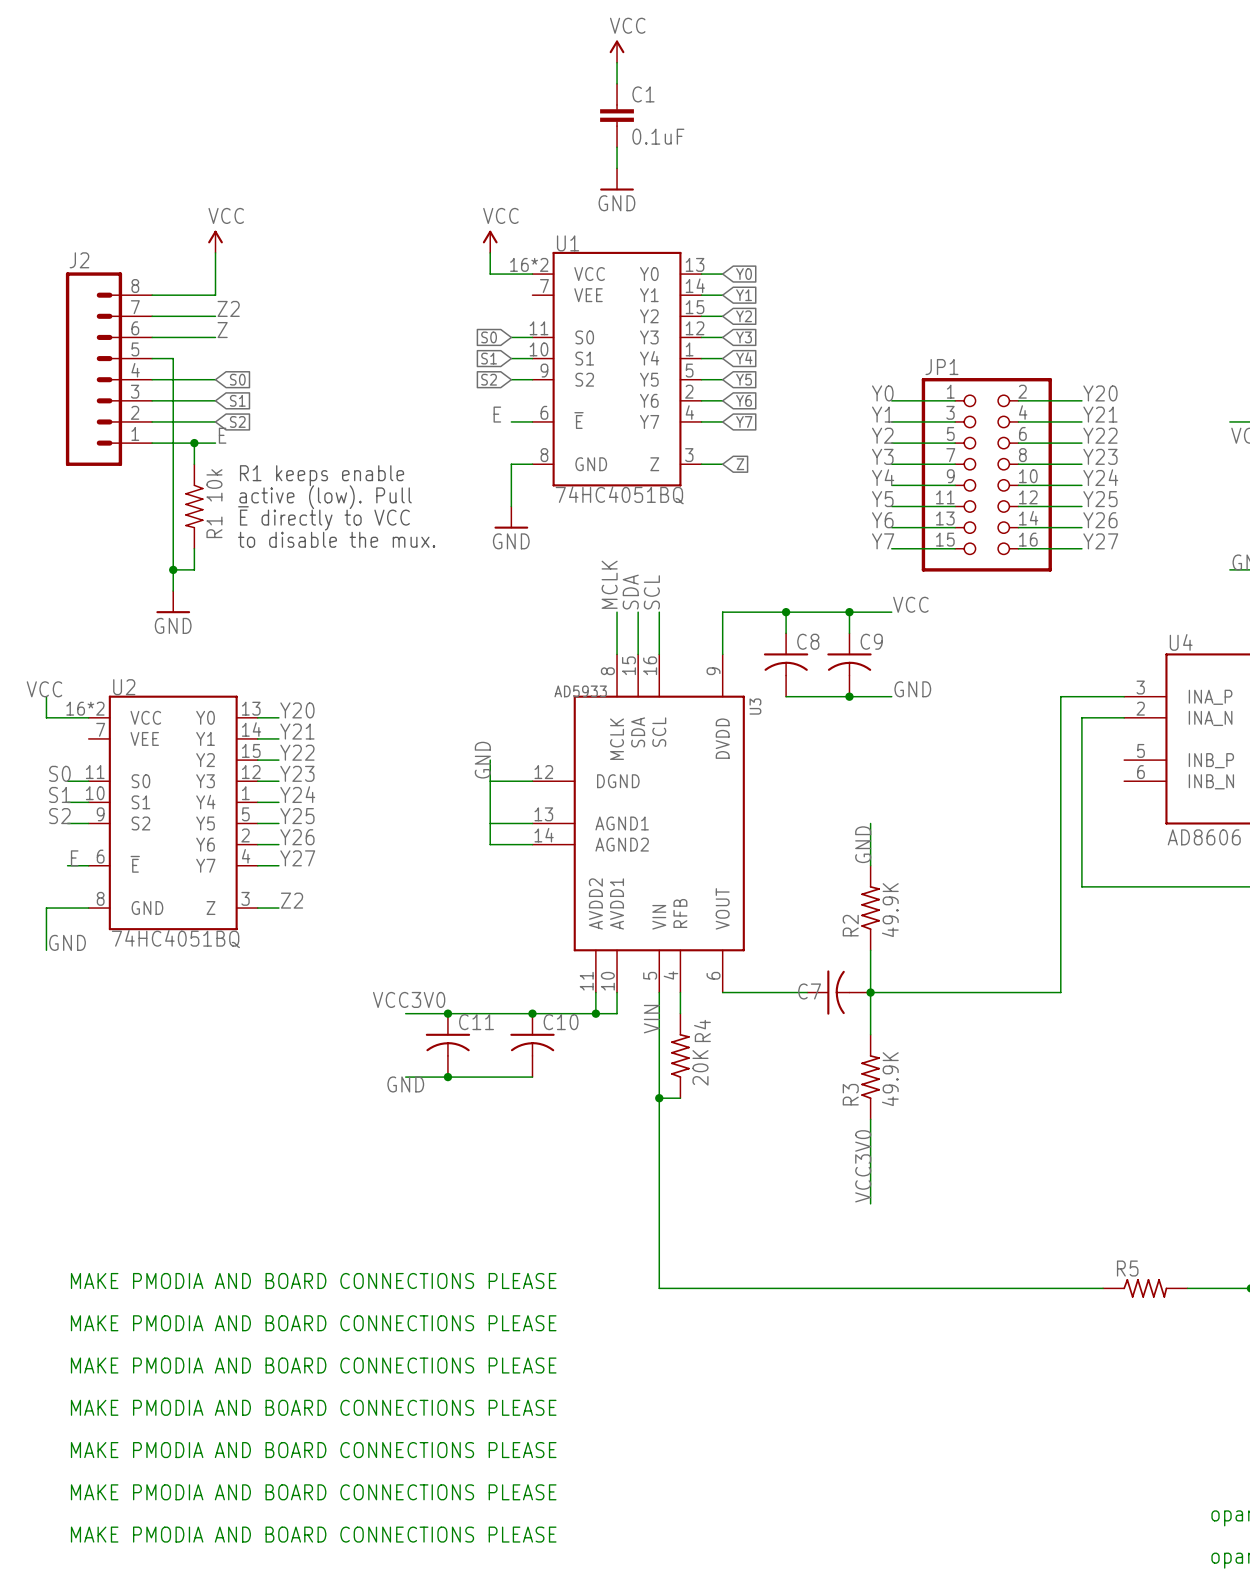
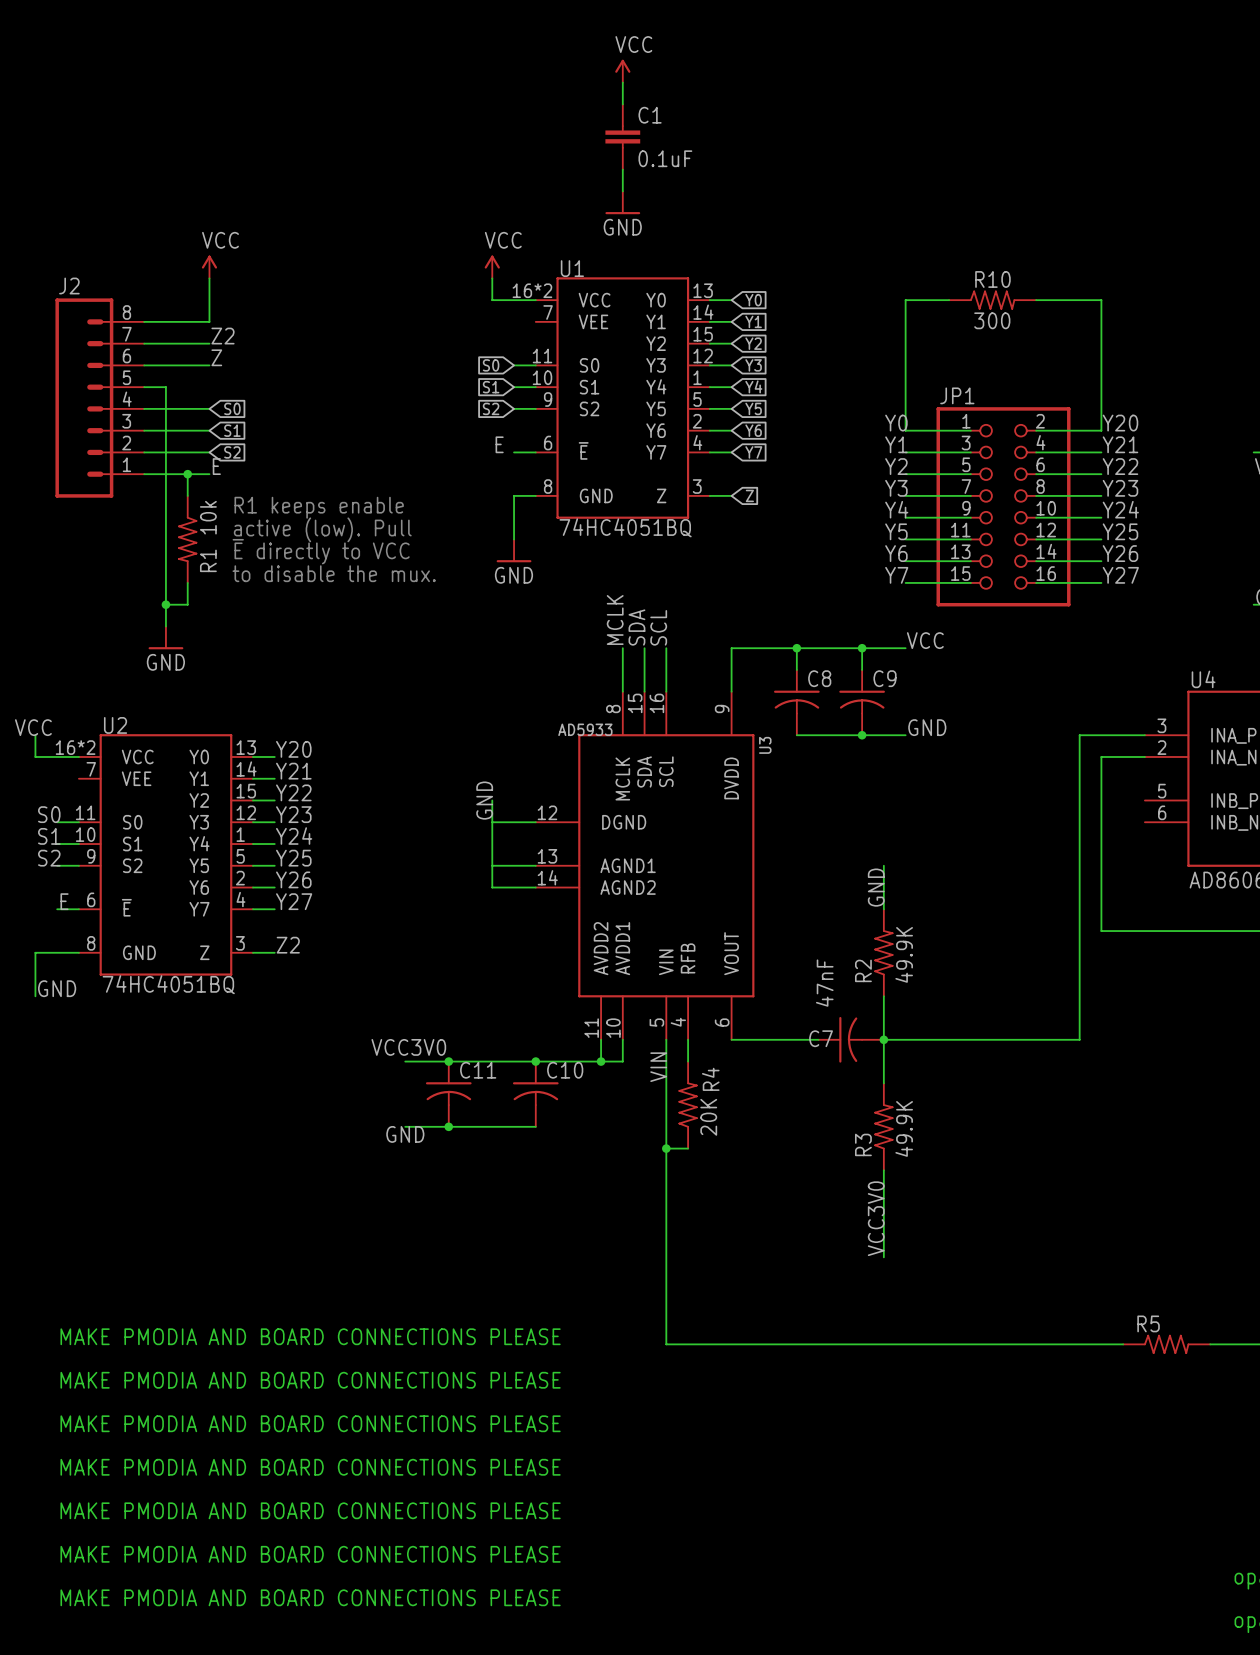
wire: none -> (949, 300) (905, 300) (905, 430)
R10: none -> 300 (992, 300)
wire: none -> (1036, 300) (1101, 300) (1101, 430)
C7 value: none -> 47nF (824, 983)

